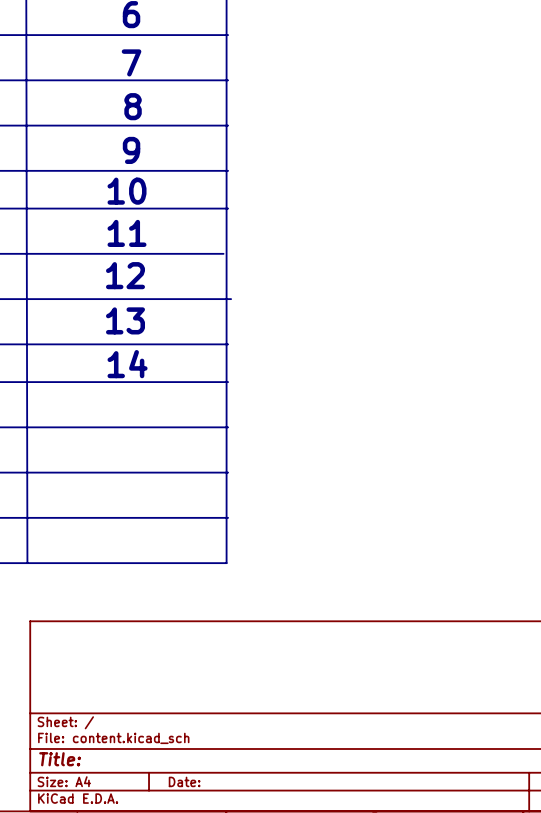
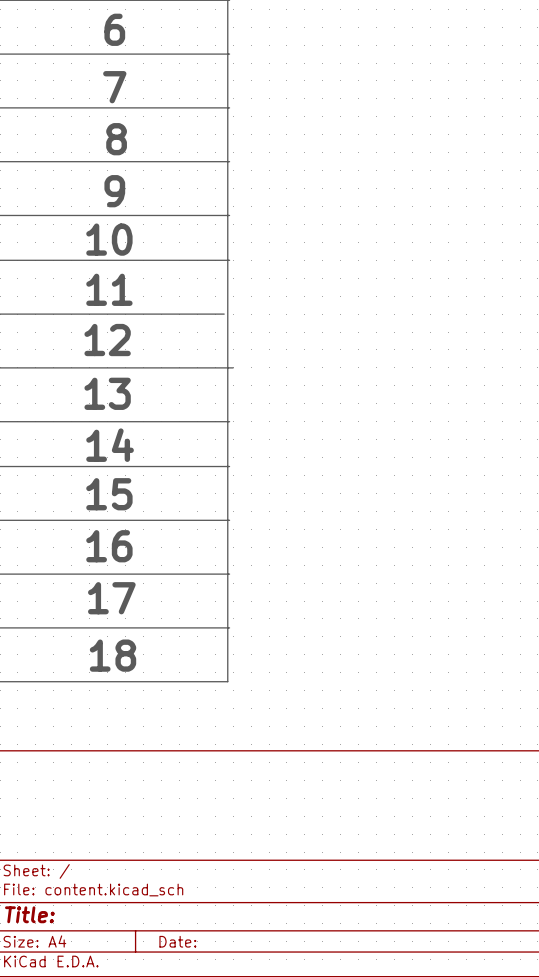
text: none -> 15 (109, 494)
text: none -> 16 (109, 546)
text: none -> 17 (111, 598)
text: none -> 18 (113, 655)

